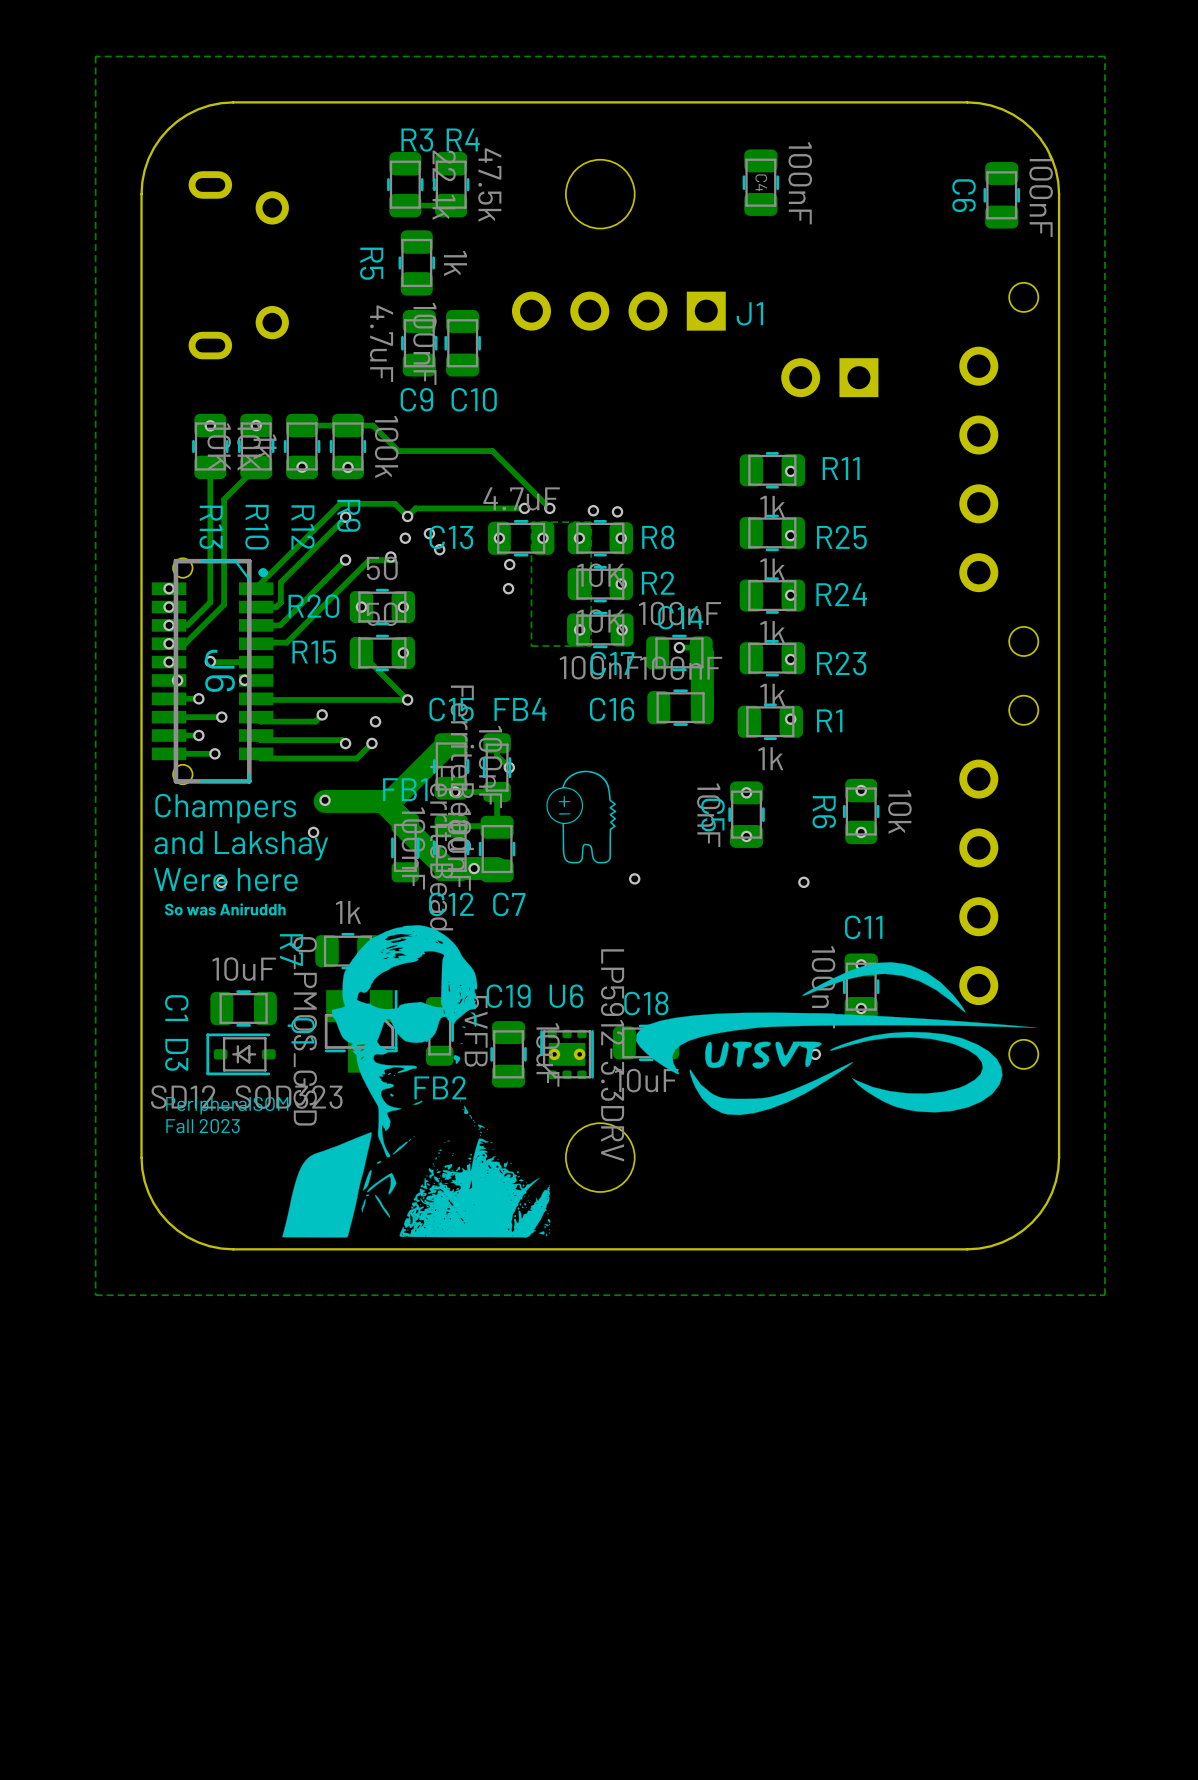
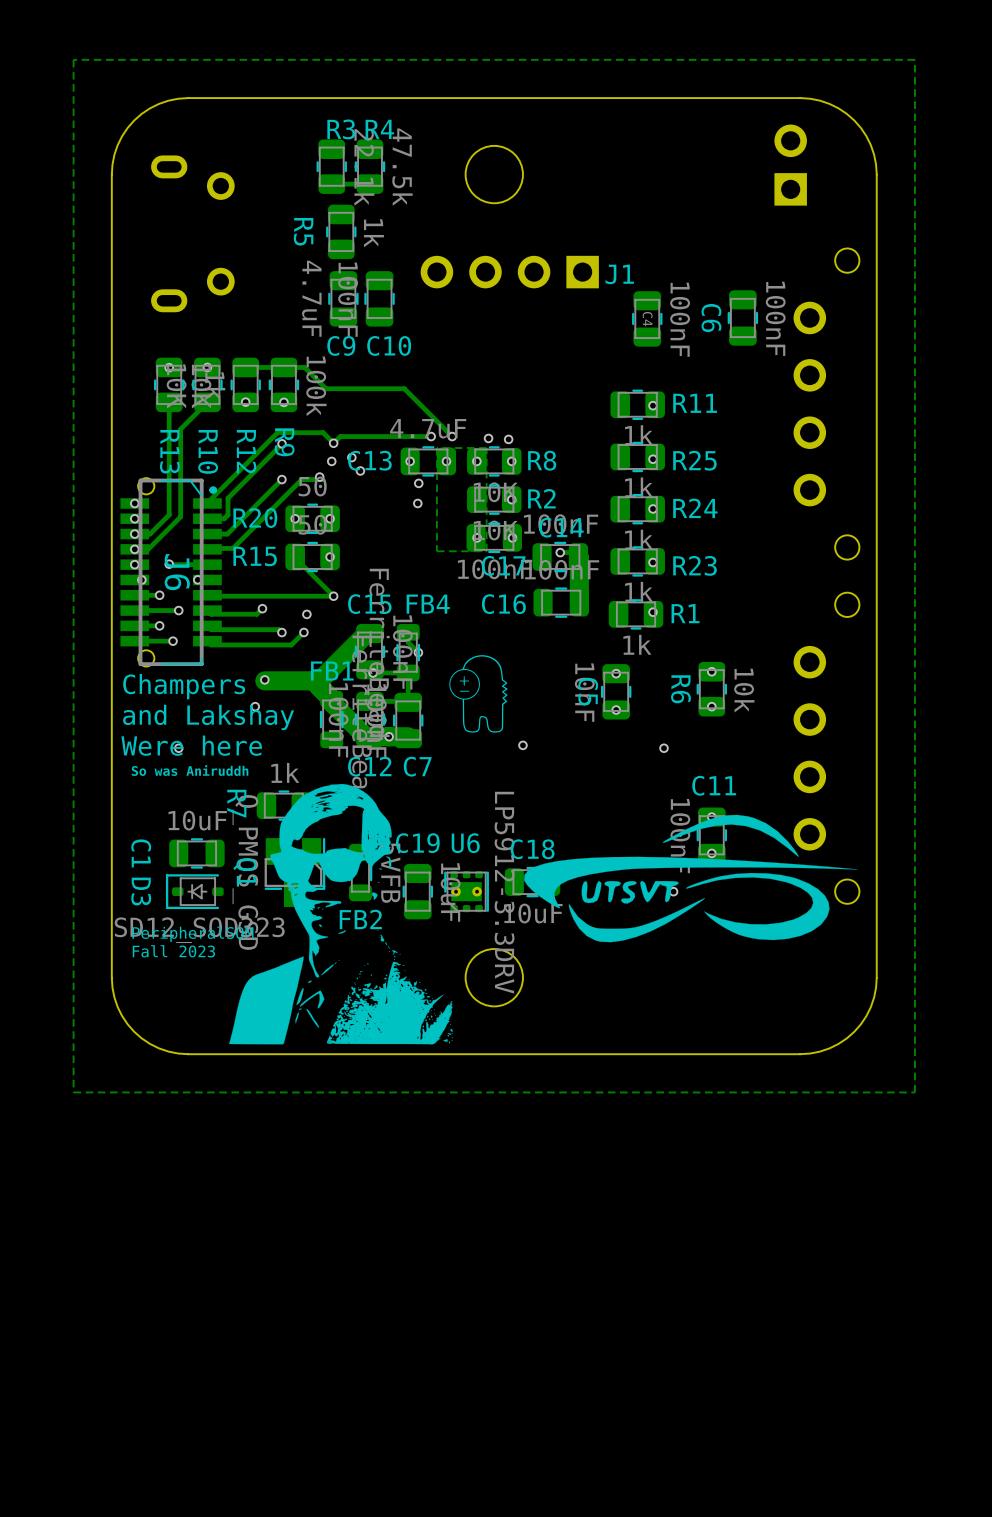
C4 position: (760, 182) -> (647, 318)
C6 position: (1001, 195) -> (742, 317)
part rotation: 0° (829, 377) -> 90° clockwise (790, 165)
part position: (829, 377) -> (790, 165)

